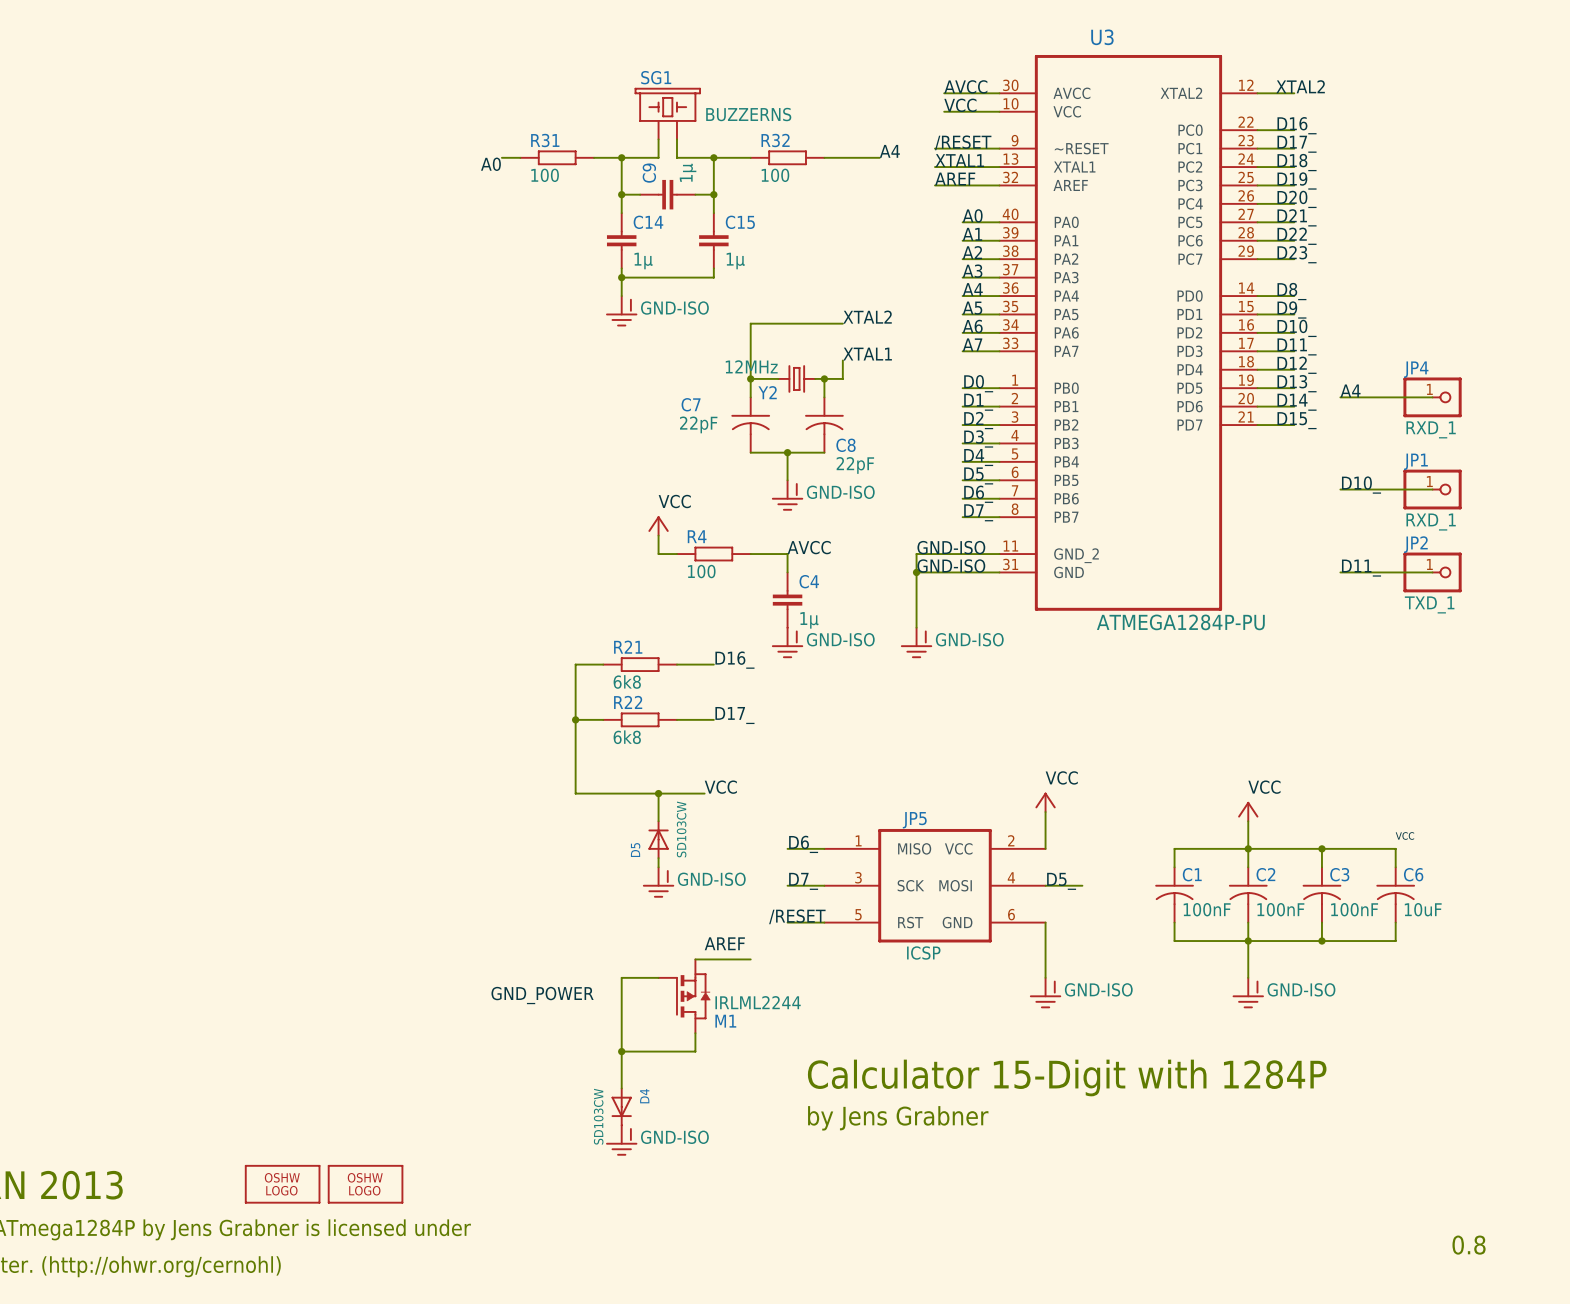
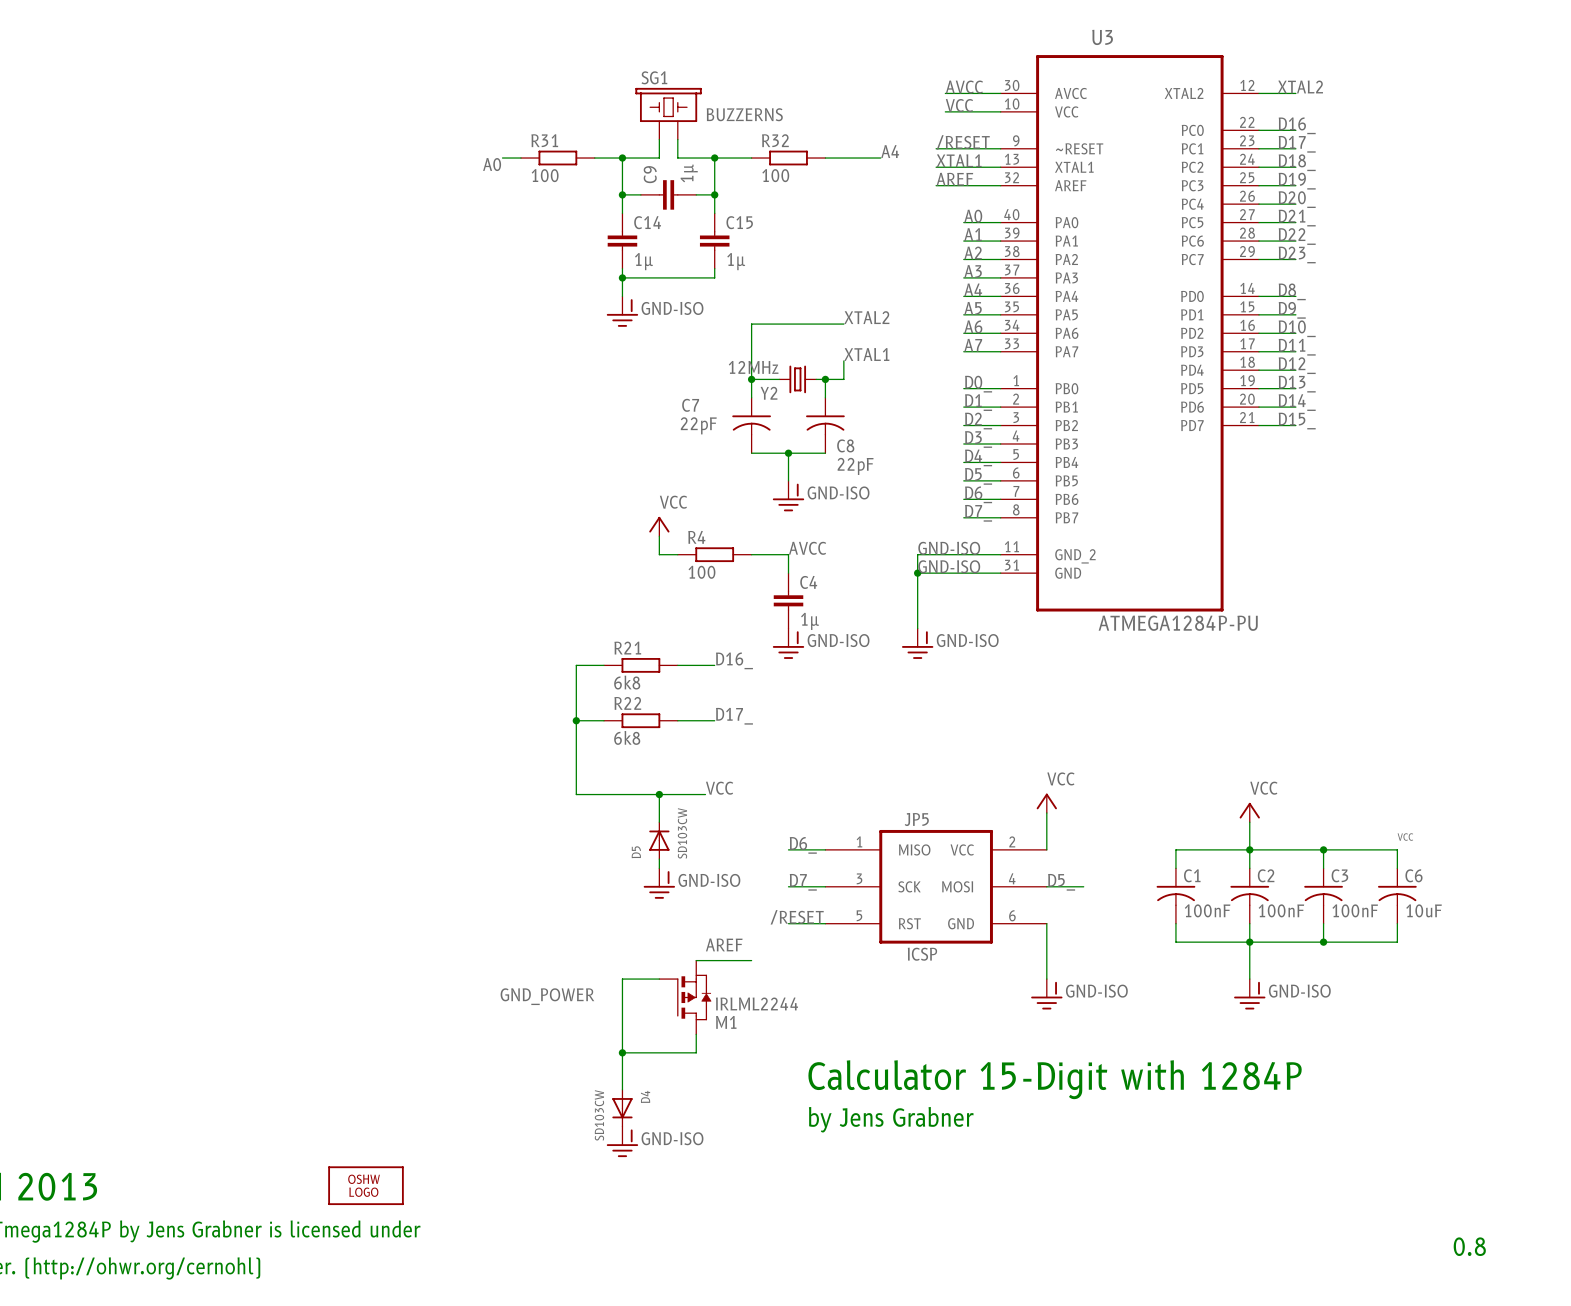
label: A4 (1350, 390) -> none
wire: (1340, 397) (1432, 397) -> none
JP4: RXD_1 (1432, 397) -> none
label: D10_ (1361, 485) -> none
wire: (1340, 489) (1432, 489) -> none
JP1: RXD_1 (1432, 489) -> none
label: D11_ (1361, 568) -> none
wire: (1340, 572) (1432, 572) -> none
JP2: TXD_1 (1432, 572) -> none
part: (282, 1184) -> none

